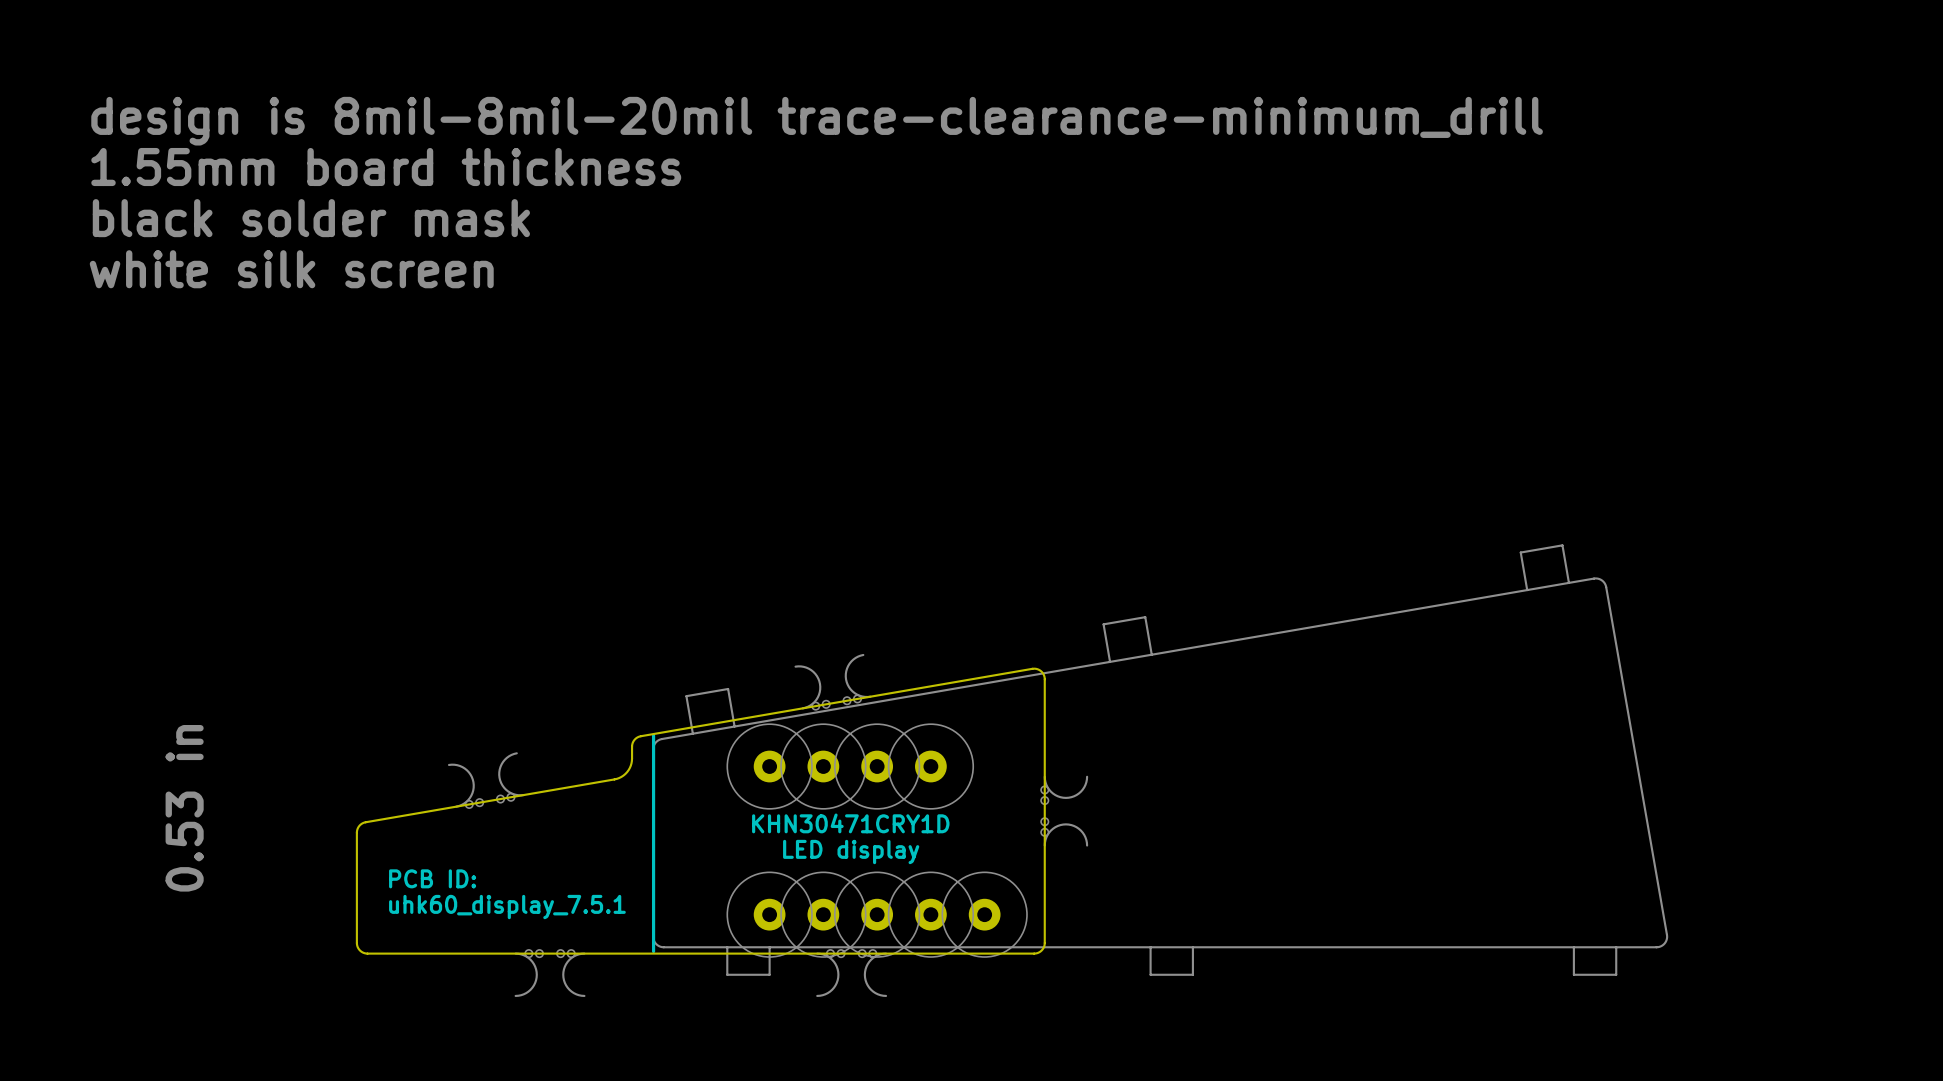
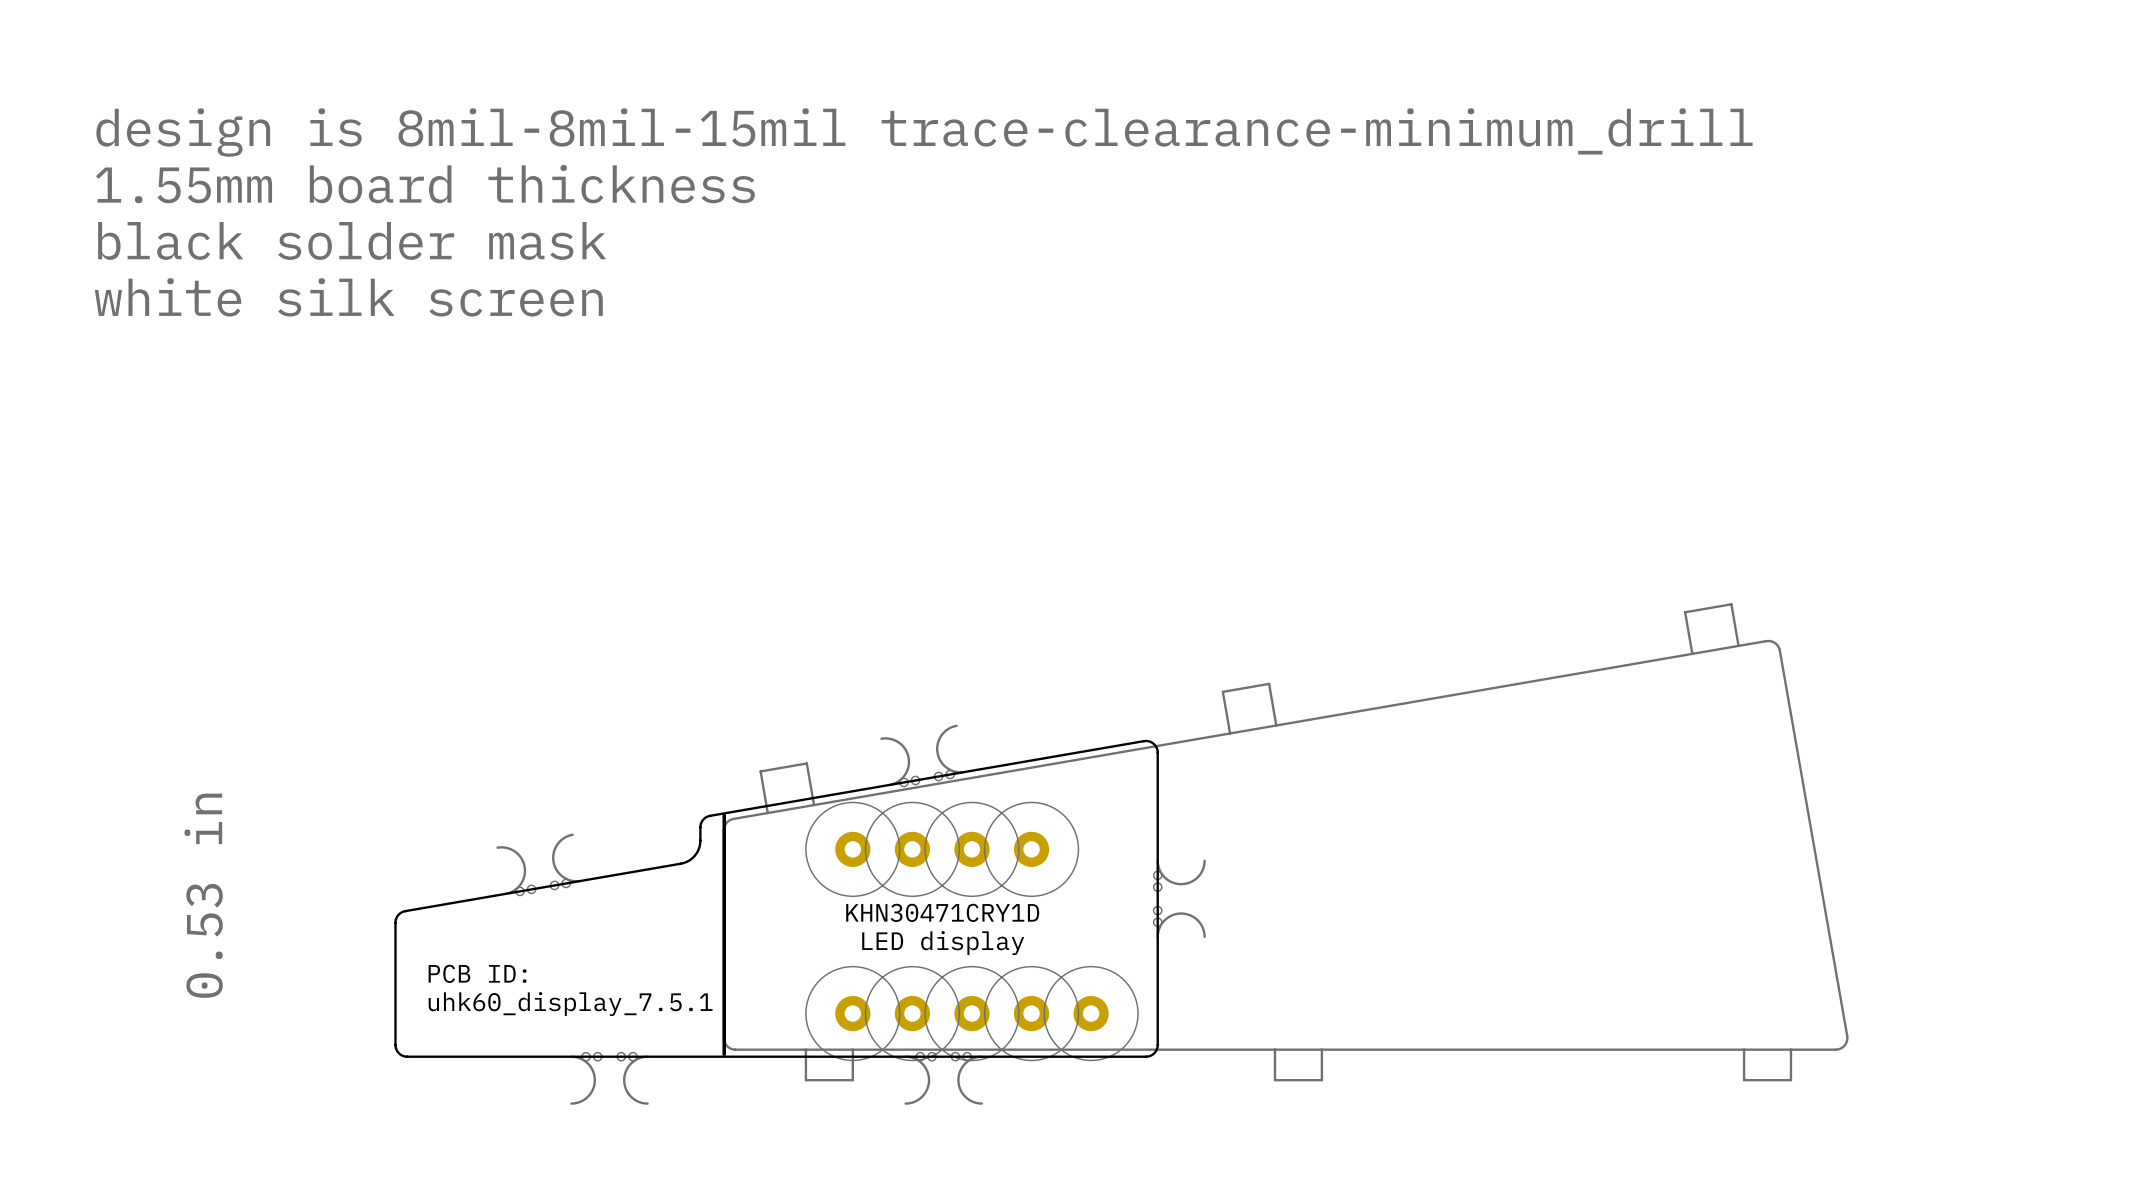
text: design is 8mil-8mil-20mil trace-clearance-minimum_drill (817, 121) -> design is 8mil-8mil-15mil trace-clearance-minimum_drill (924, 132)

